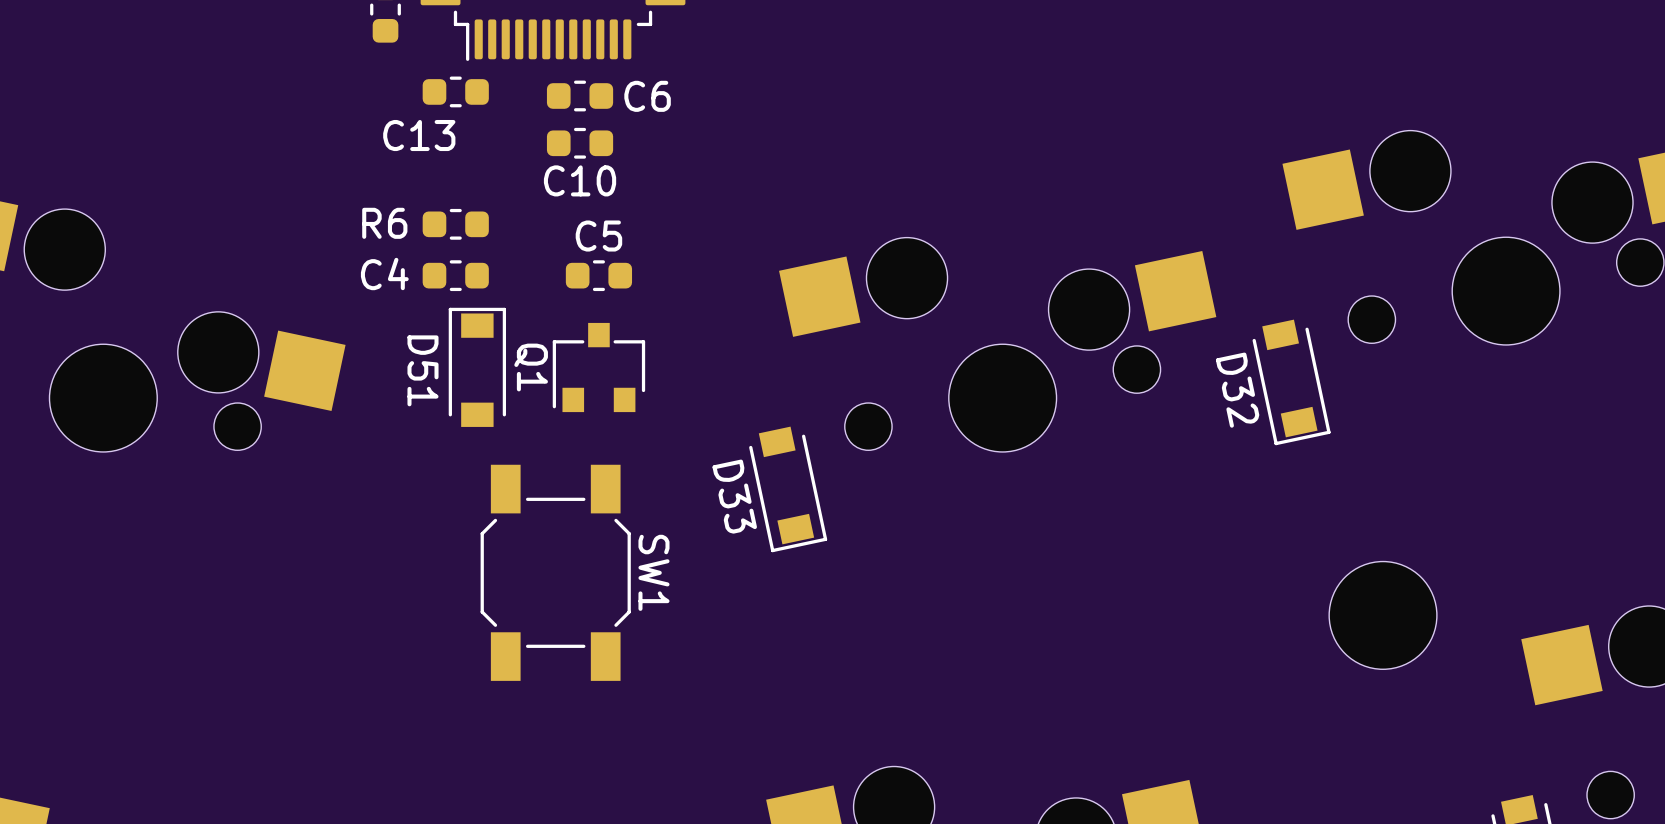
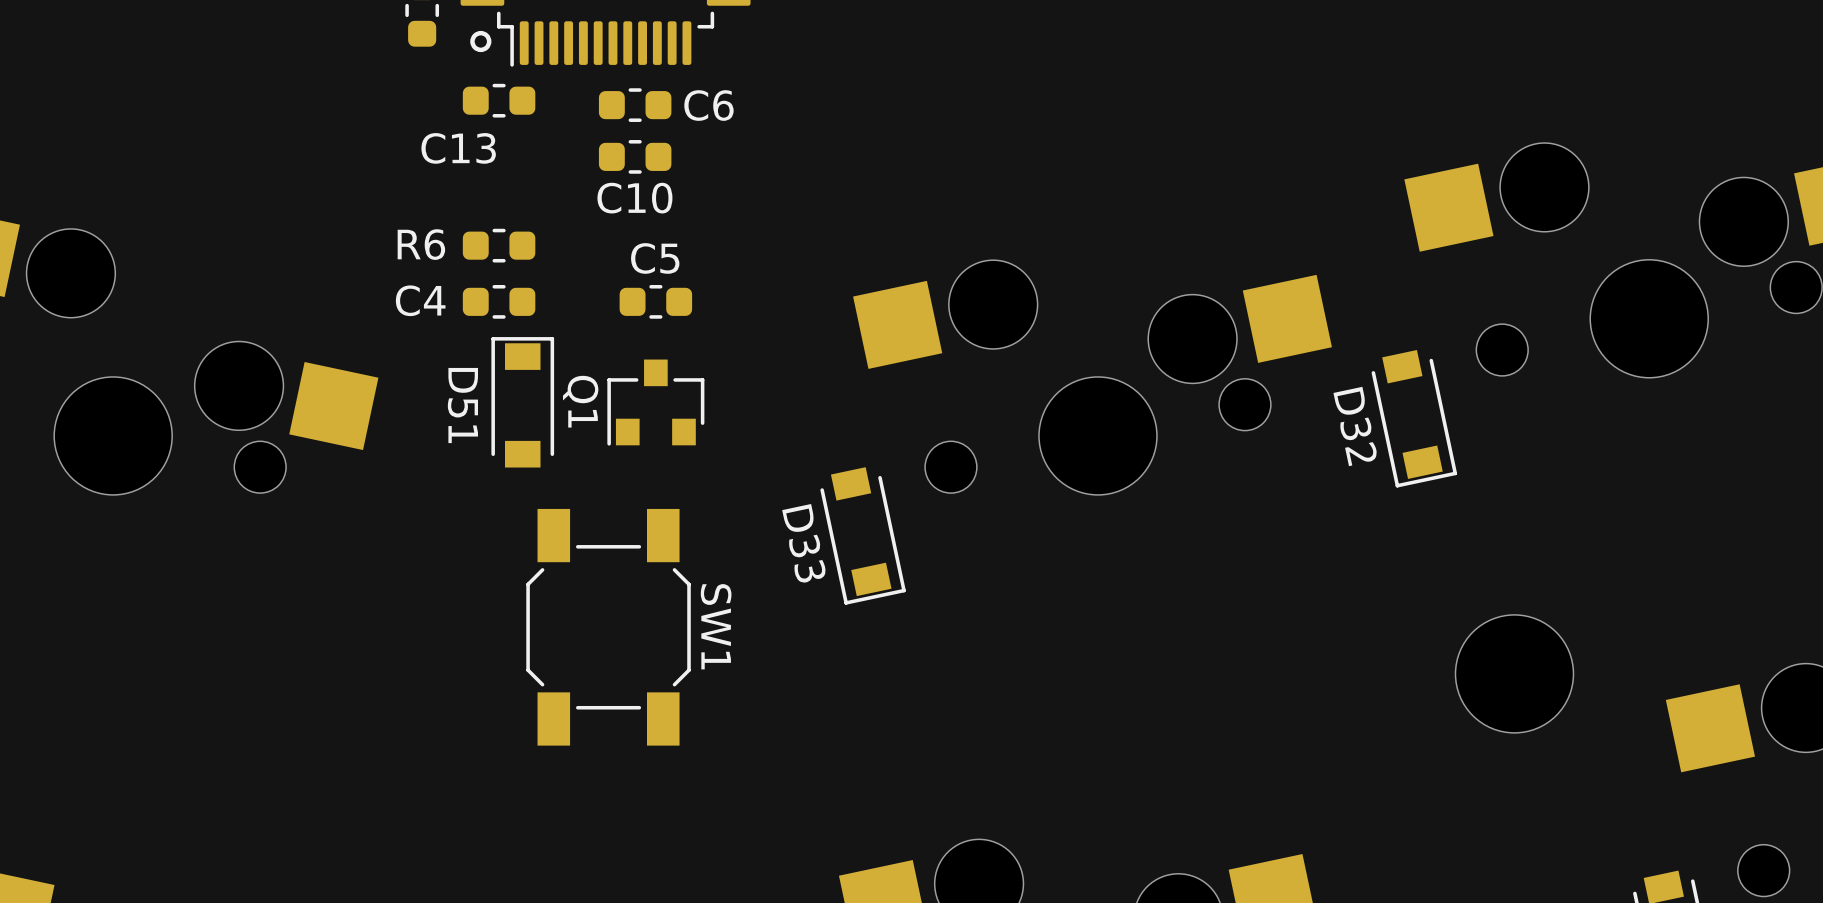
drawing: none -> [470, 30, 492, 53]
Q1 footprint: [552, 322, 646, 413] -> [607, 359, 705, 446]

